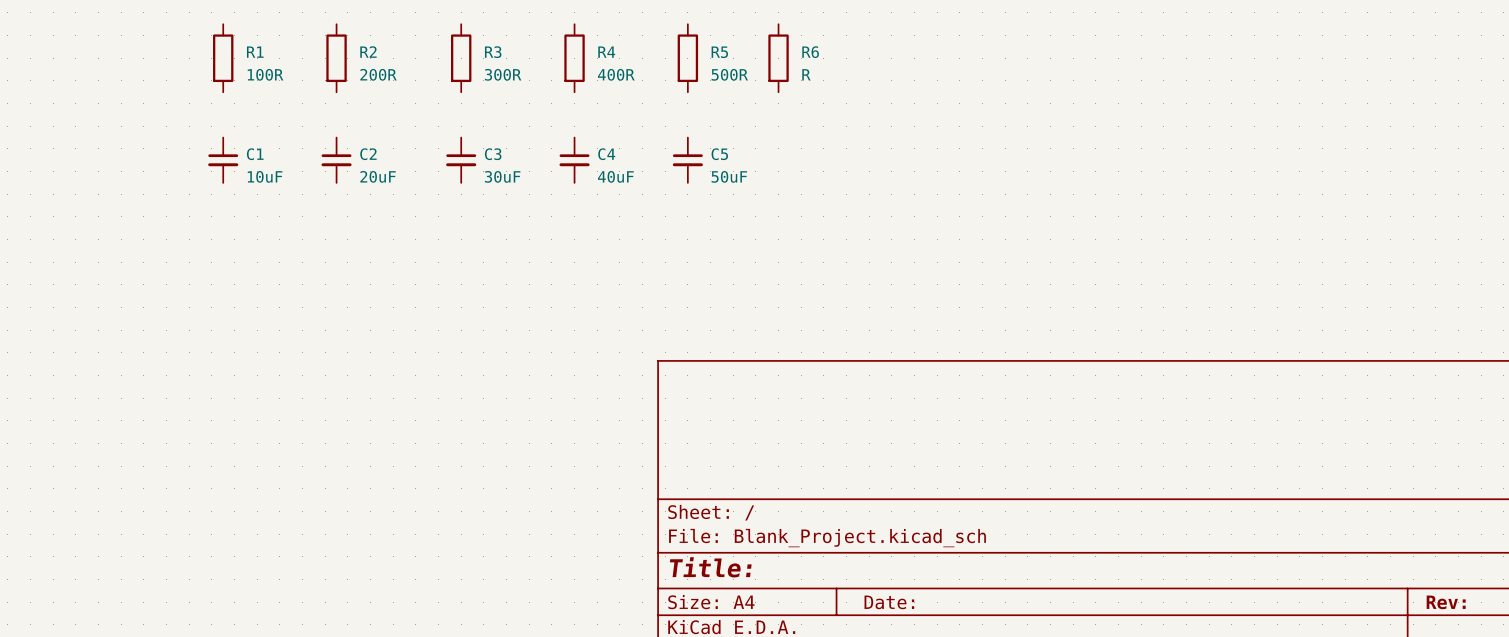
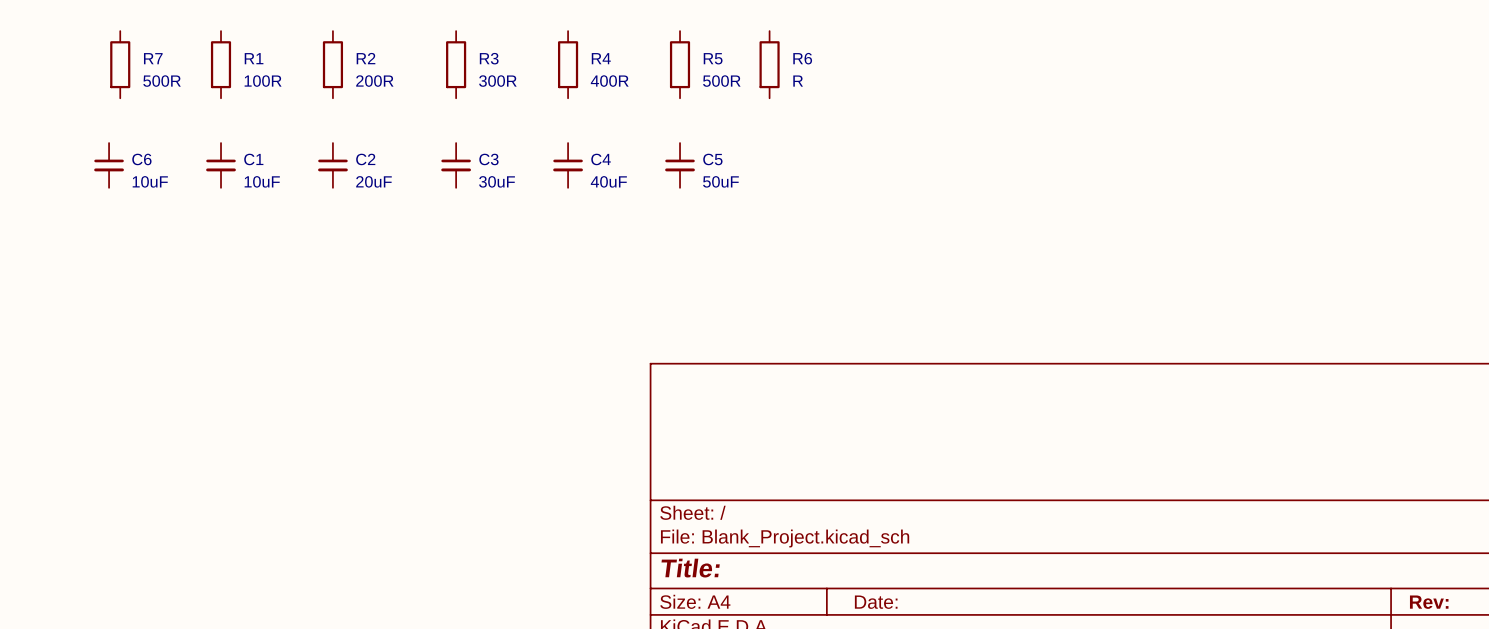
R7: none -> 500R (120, 64)
C6: none -> 10uF (109, 165)

